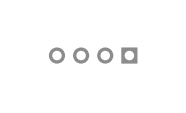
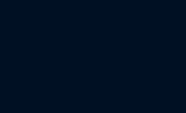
part: (93, 55) -> none

